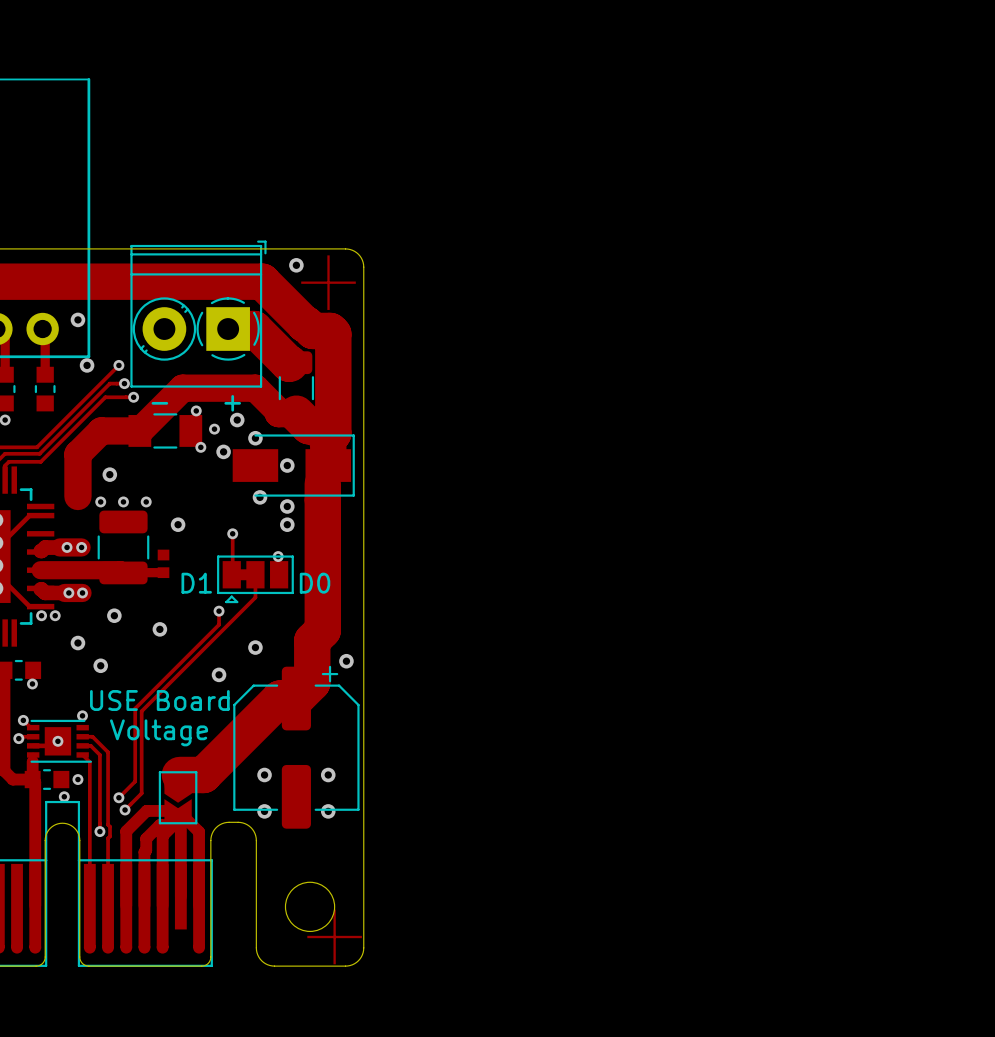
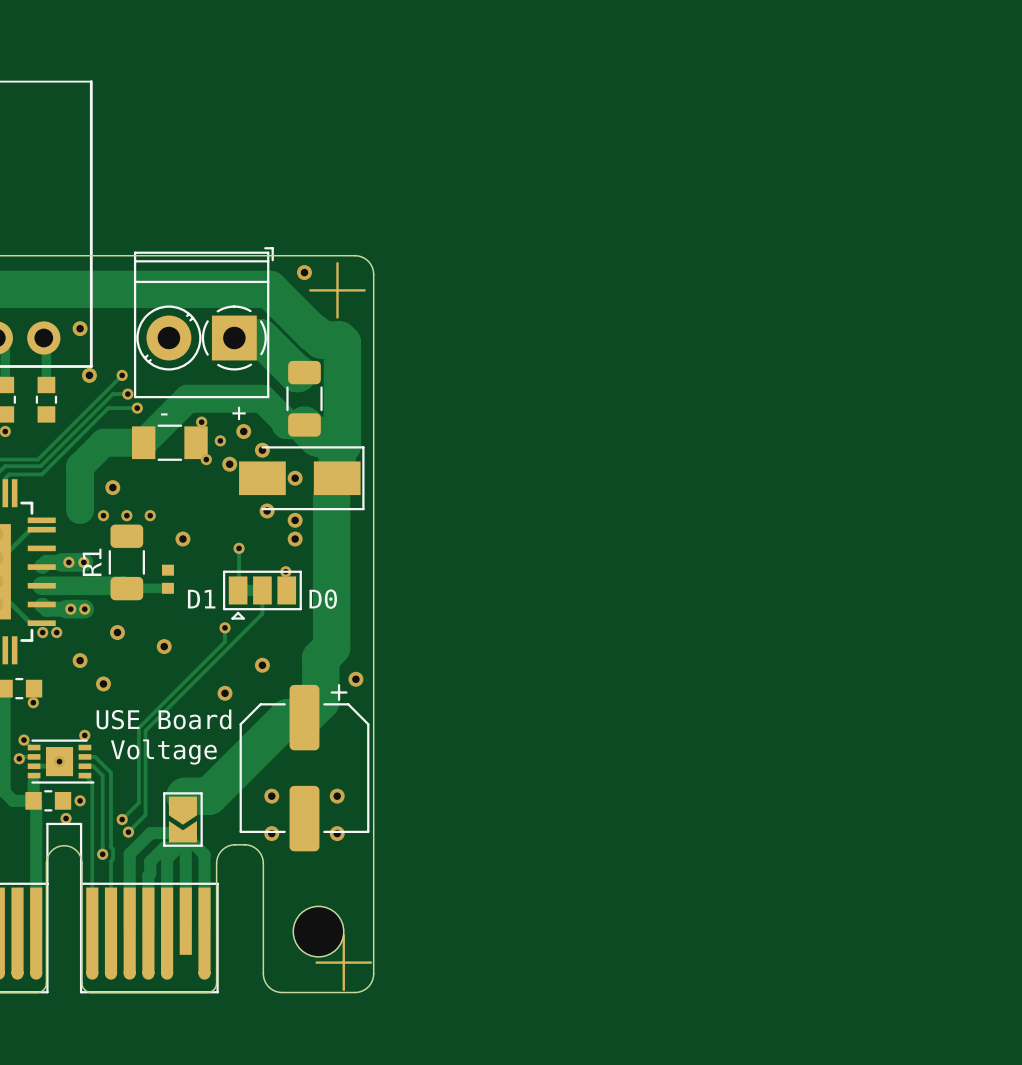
part: (123, 547) -> none
R1: none -> (126, 562)

